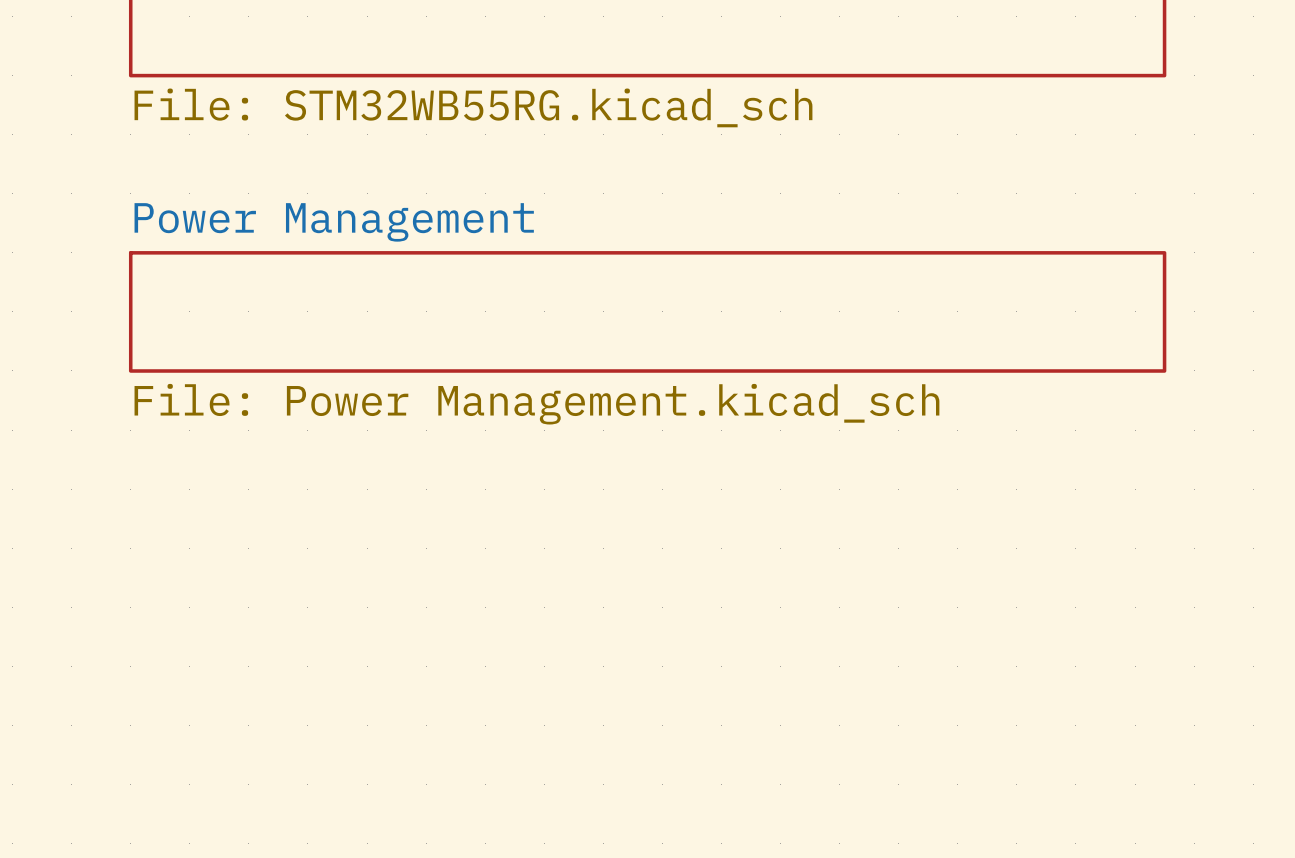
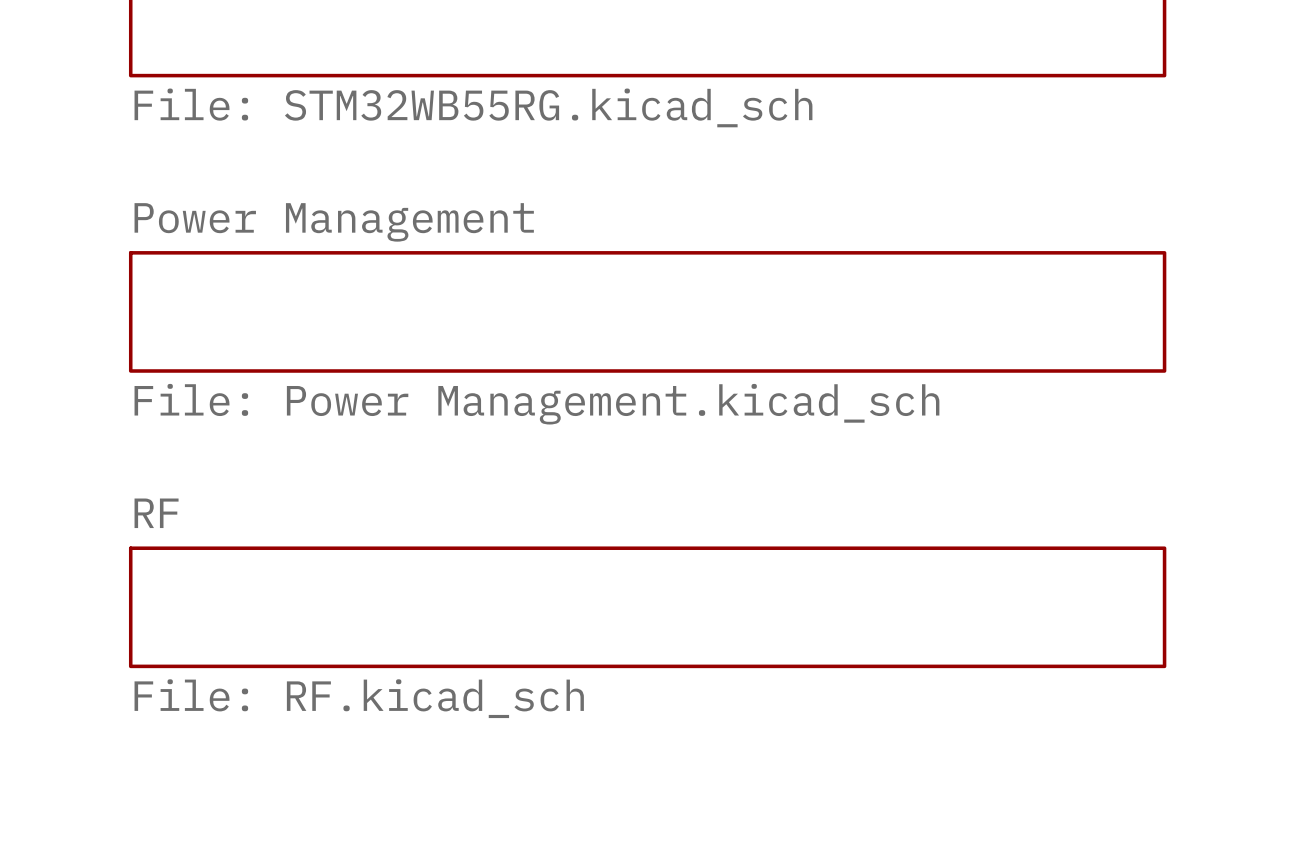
sheet RF: none -> File: RF.kicad_sch (647, 607)

